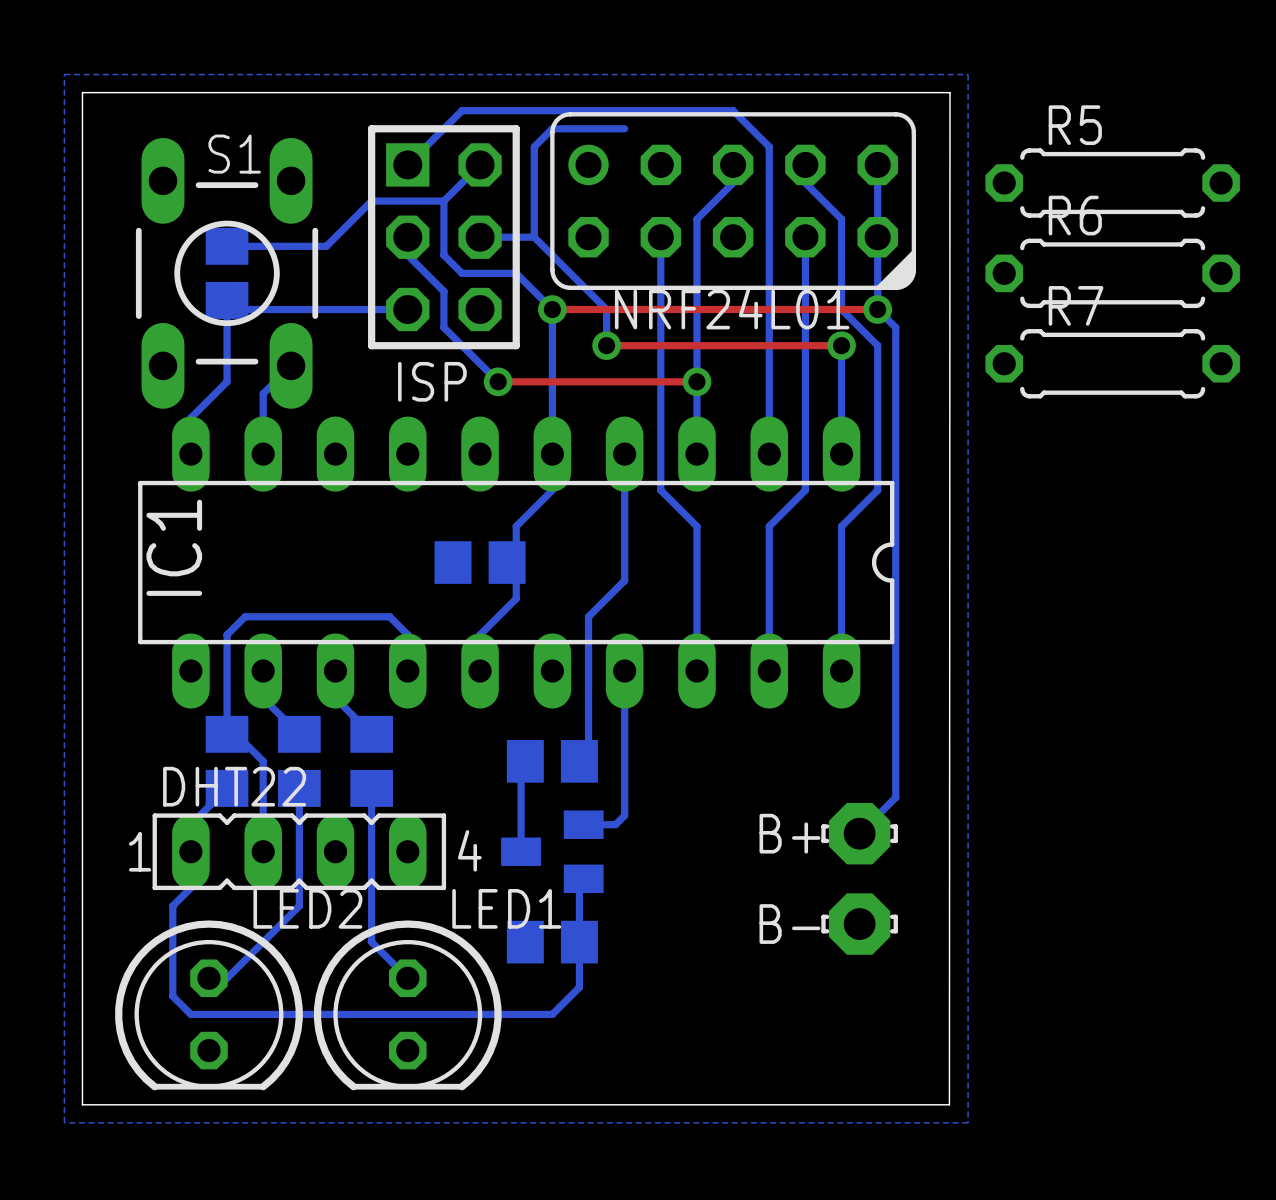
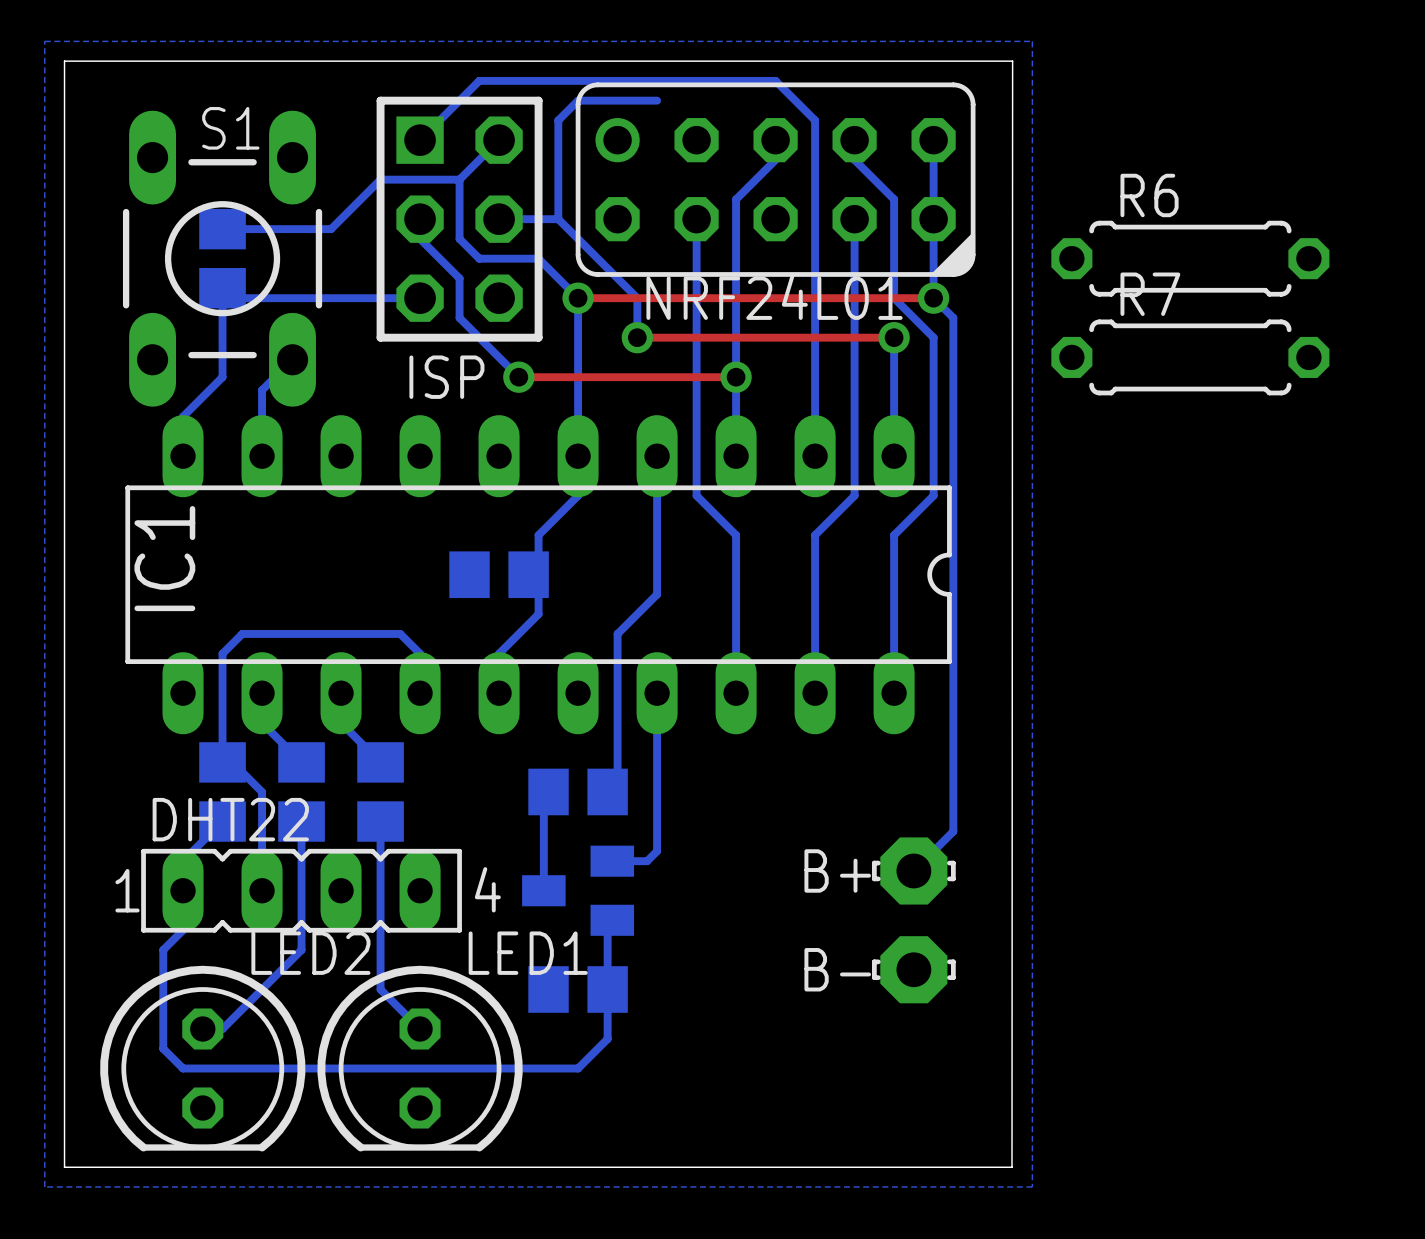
R5: (1112, 183) -> none

